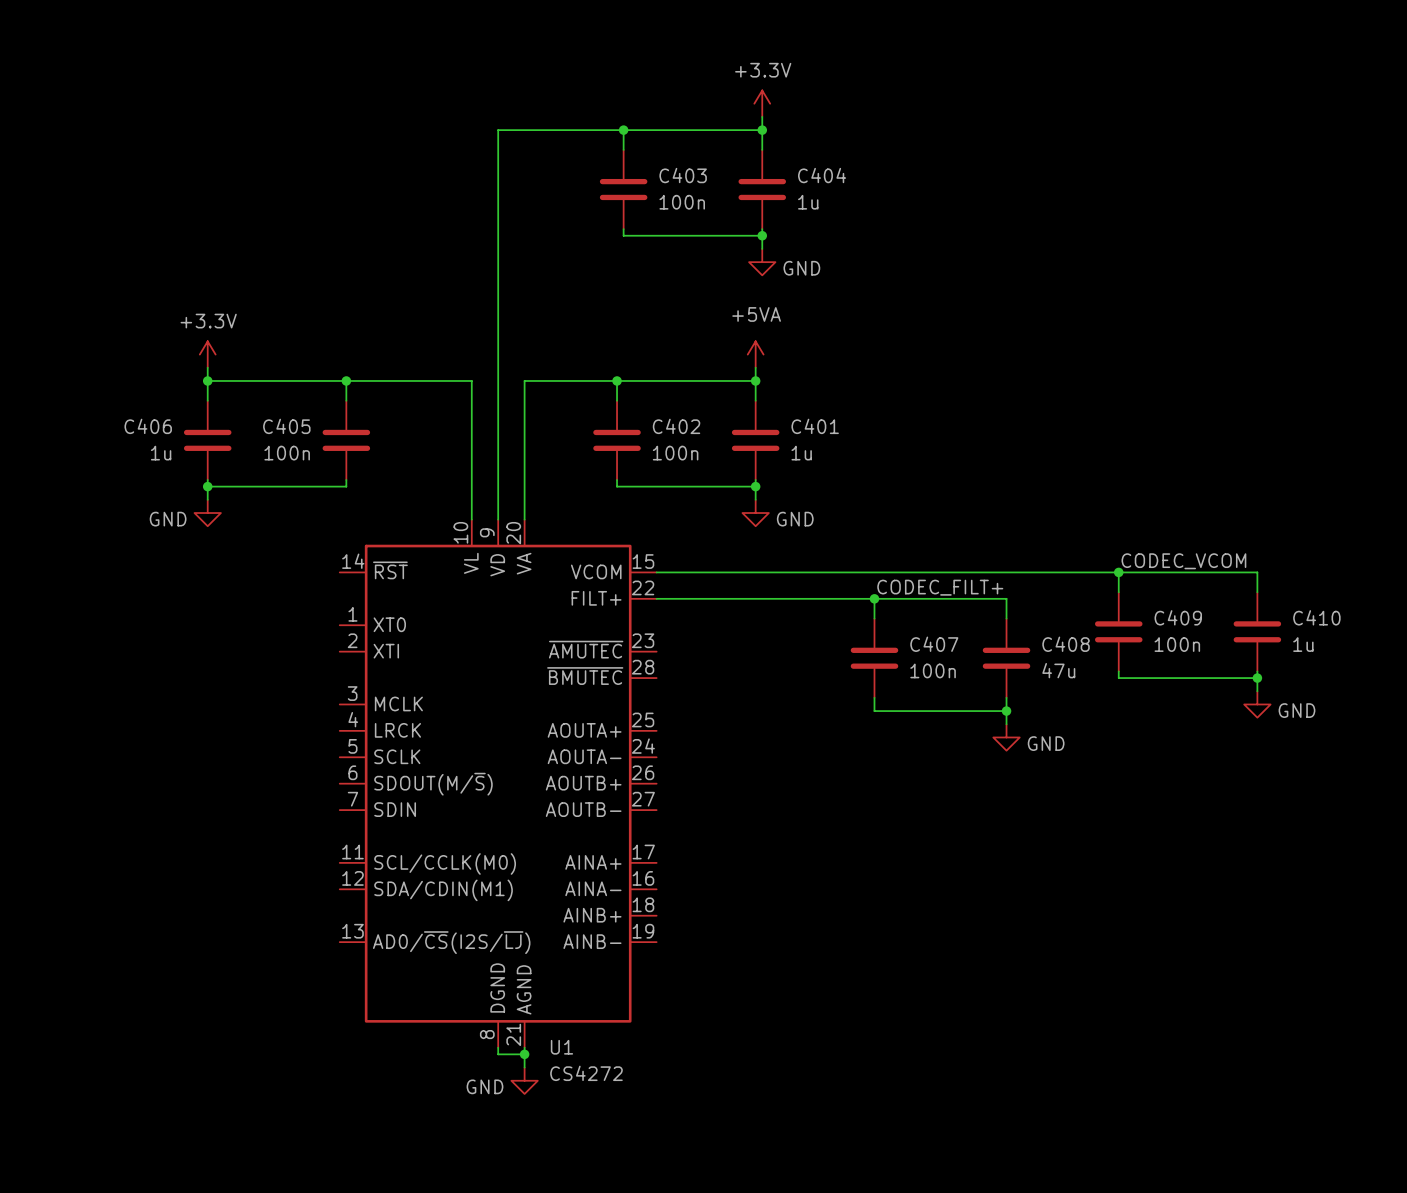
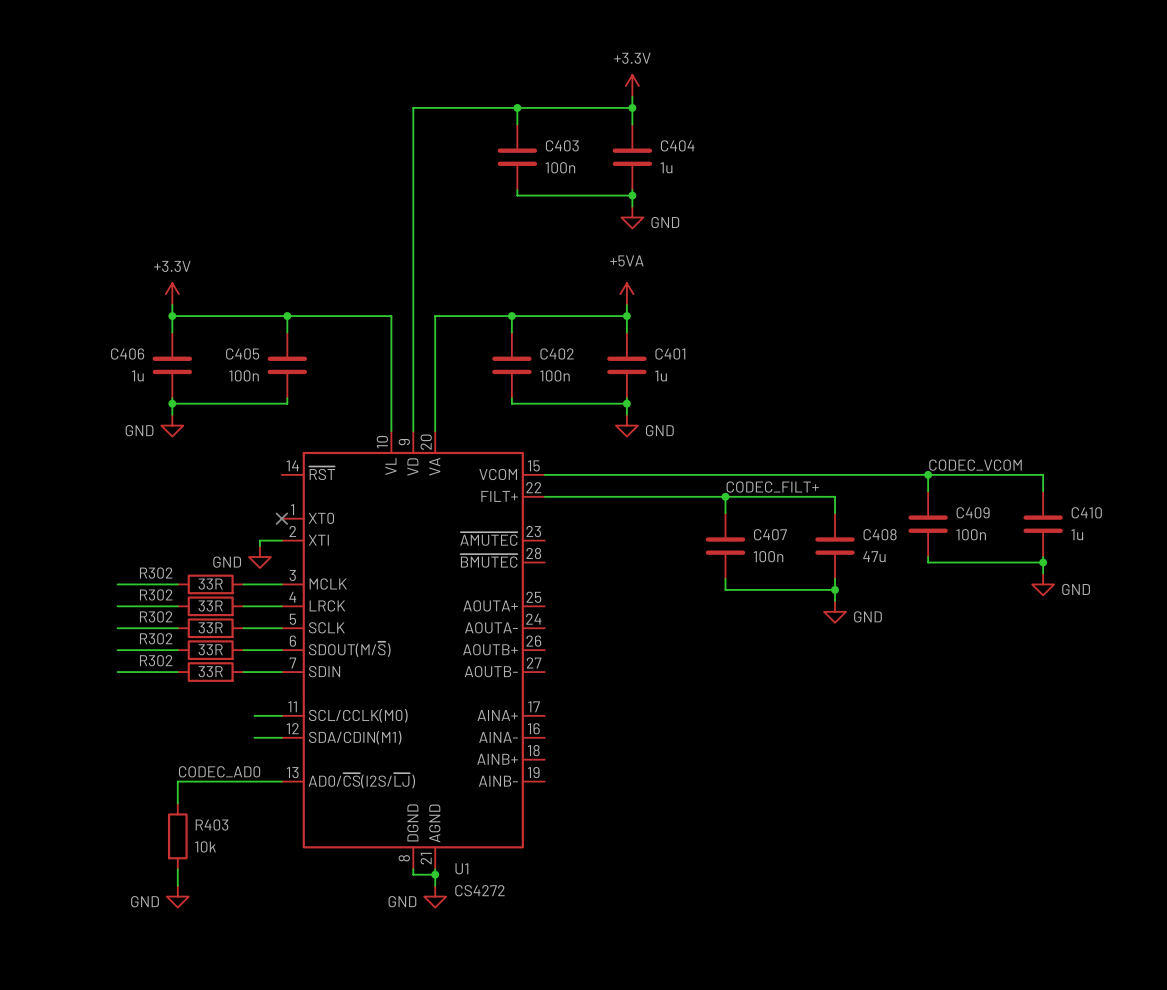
no-connect mark: none -> (281, 518)
wire: none -> (281, 540) (259, 540) (259, 546)
power symbol: none -> GND (259, 557)
wire: none -> (117, 584) (177, 584)
R302: none -> 33R (210, 584)
wire: none -> (243, 584) (281, 584)
wire: none -> (117, 606) (177, 606)
R302: none -> 33R (210, 606)
wire: none -> (243, 606) (281, 606)
wire: none -> (117, 628) (177, 628)
R302: none -> 33R (210, 628)
wire: none -> (243, 628) (281, 628)
wire: none -> (117, 650) (177, 650)
R302: none -> 33R (210, 650)
wire: none -> (243, 650) (281, 650)
wire: none -> (117, 672) (177, 672)
R302: none -> 33R (210, 672)
wire: none -> (243, 672) (281, 672)
wire: none -> (254, 715) (281, 715)
wire: none -> (254, 737) (281, 737)
label: none -> CODEC_AD0 (219, 771)
wire: none -> (281, 781) (177, 781) (177, 803)
R403: none -> 10k (177, 836)
wire: none -> (177, 869) (177, 885)
power symbol: none -> GND (177, 896)

